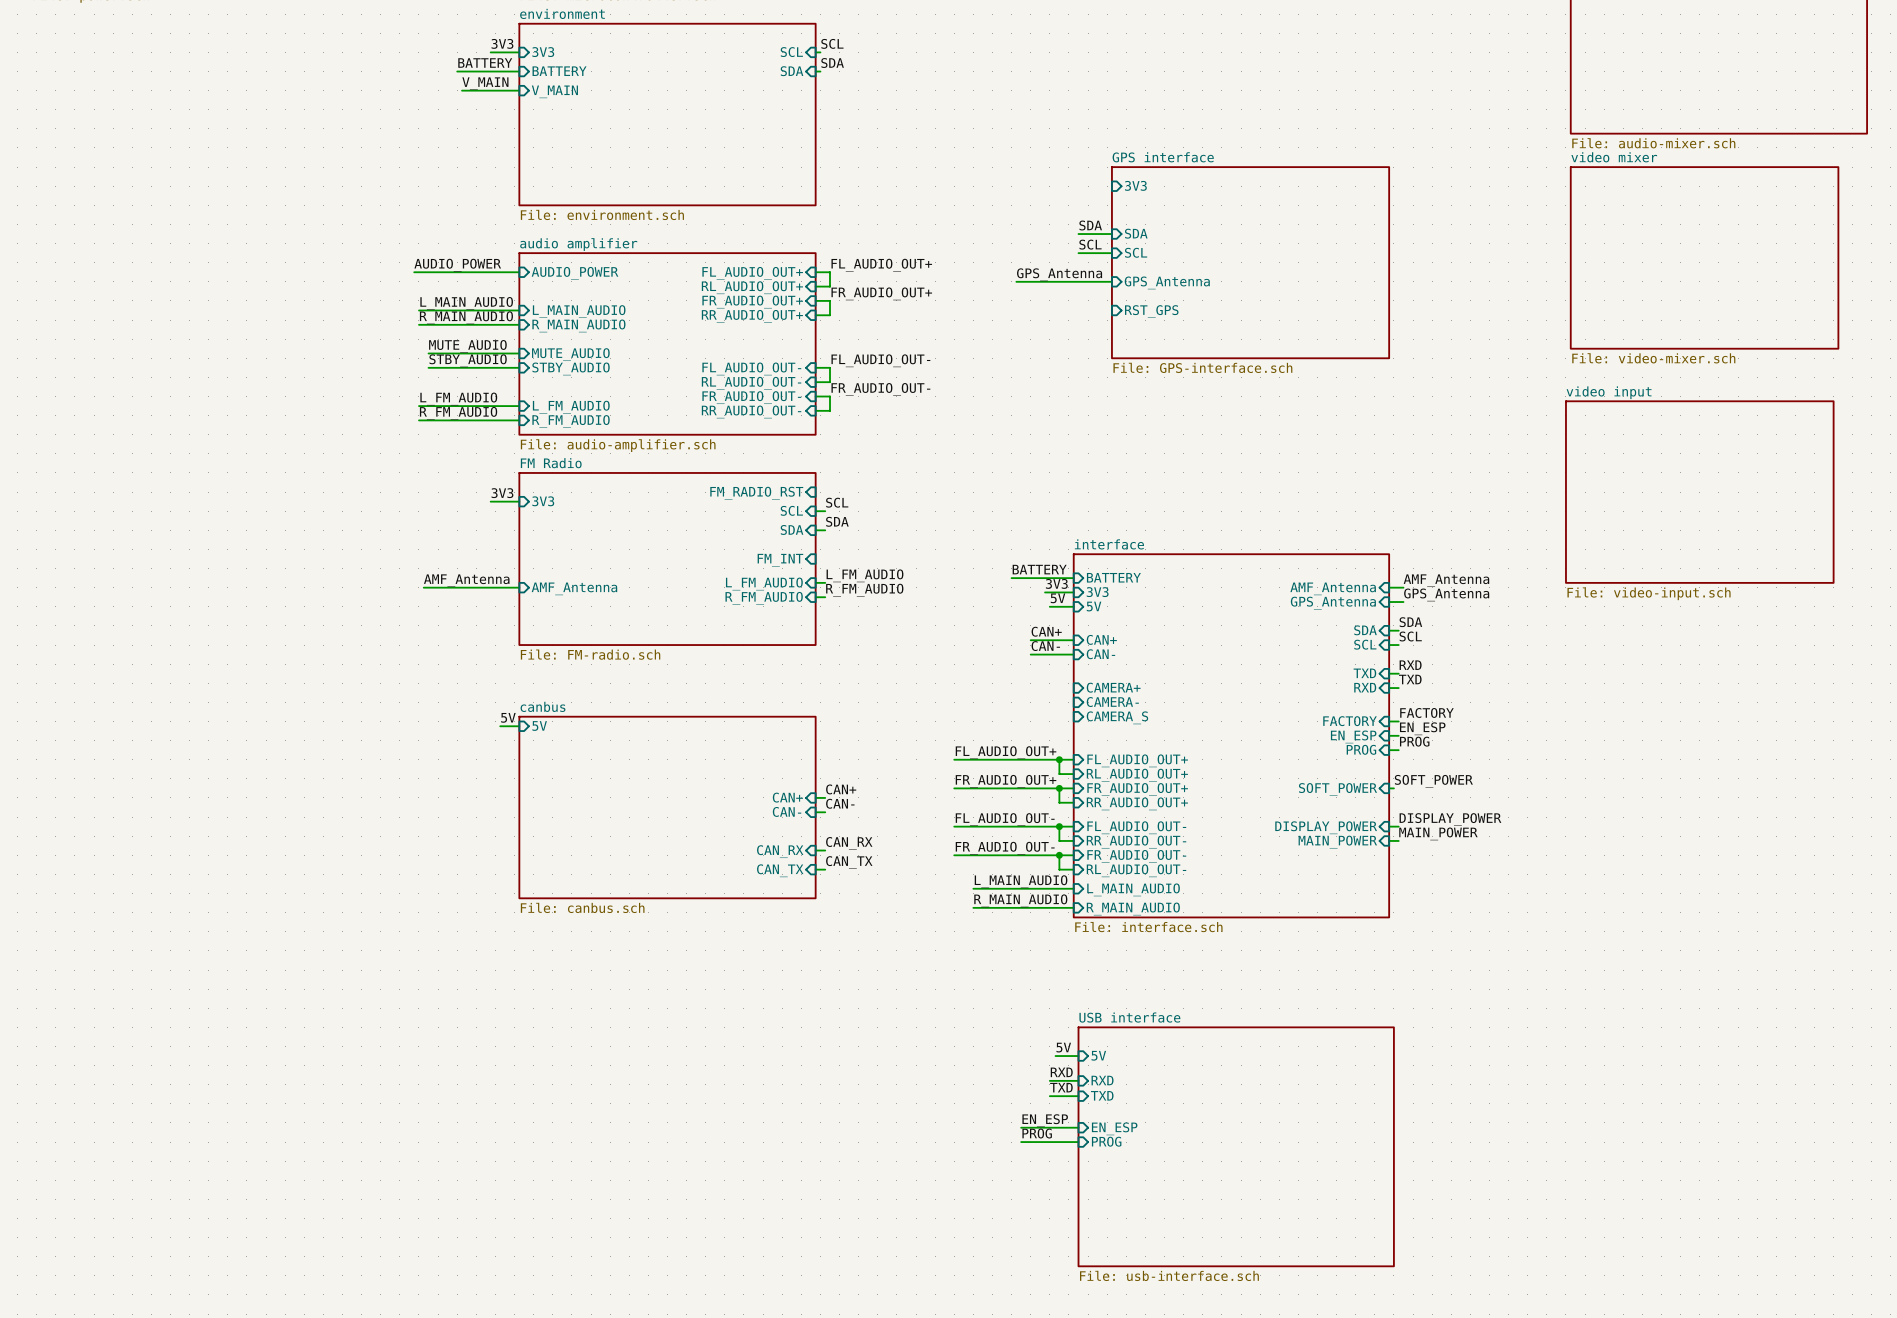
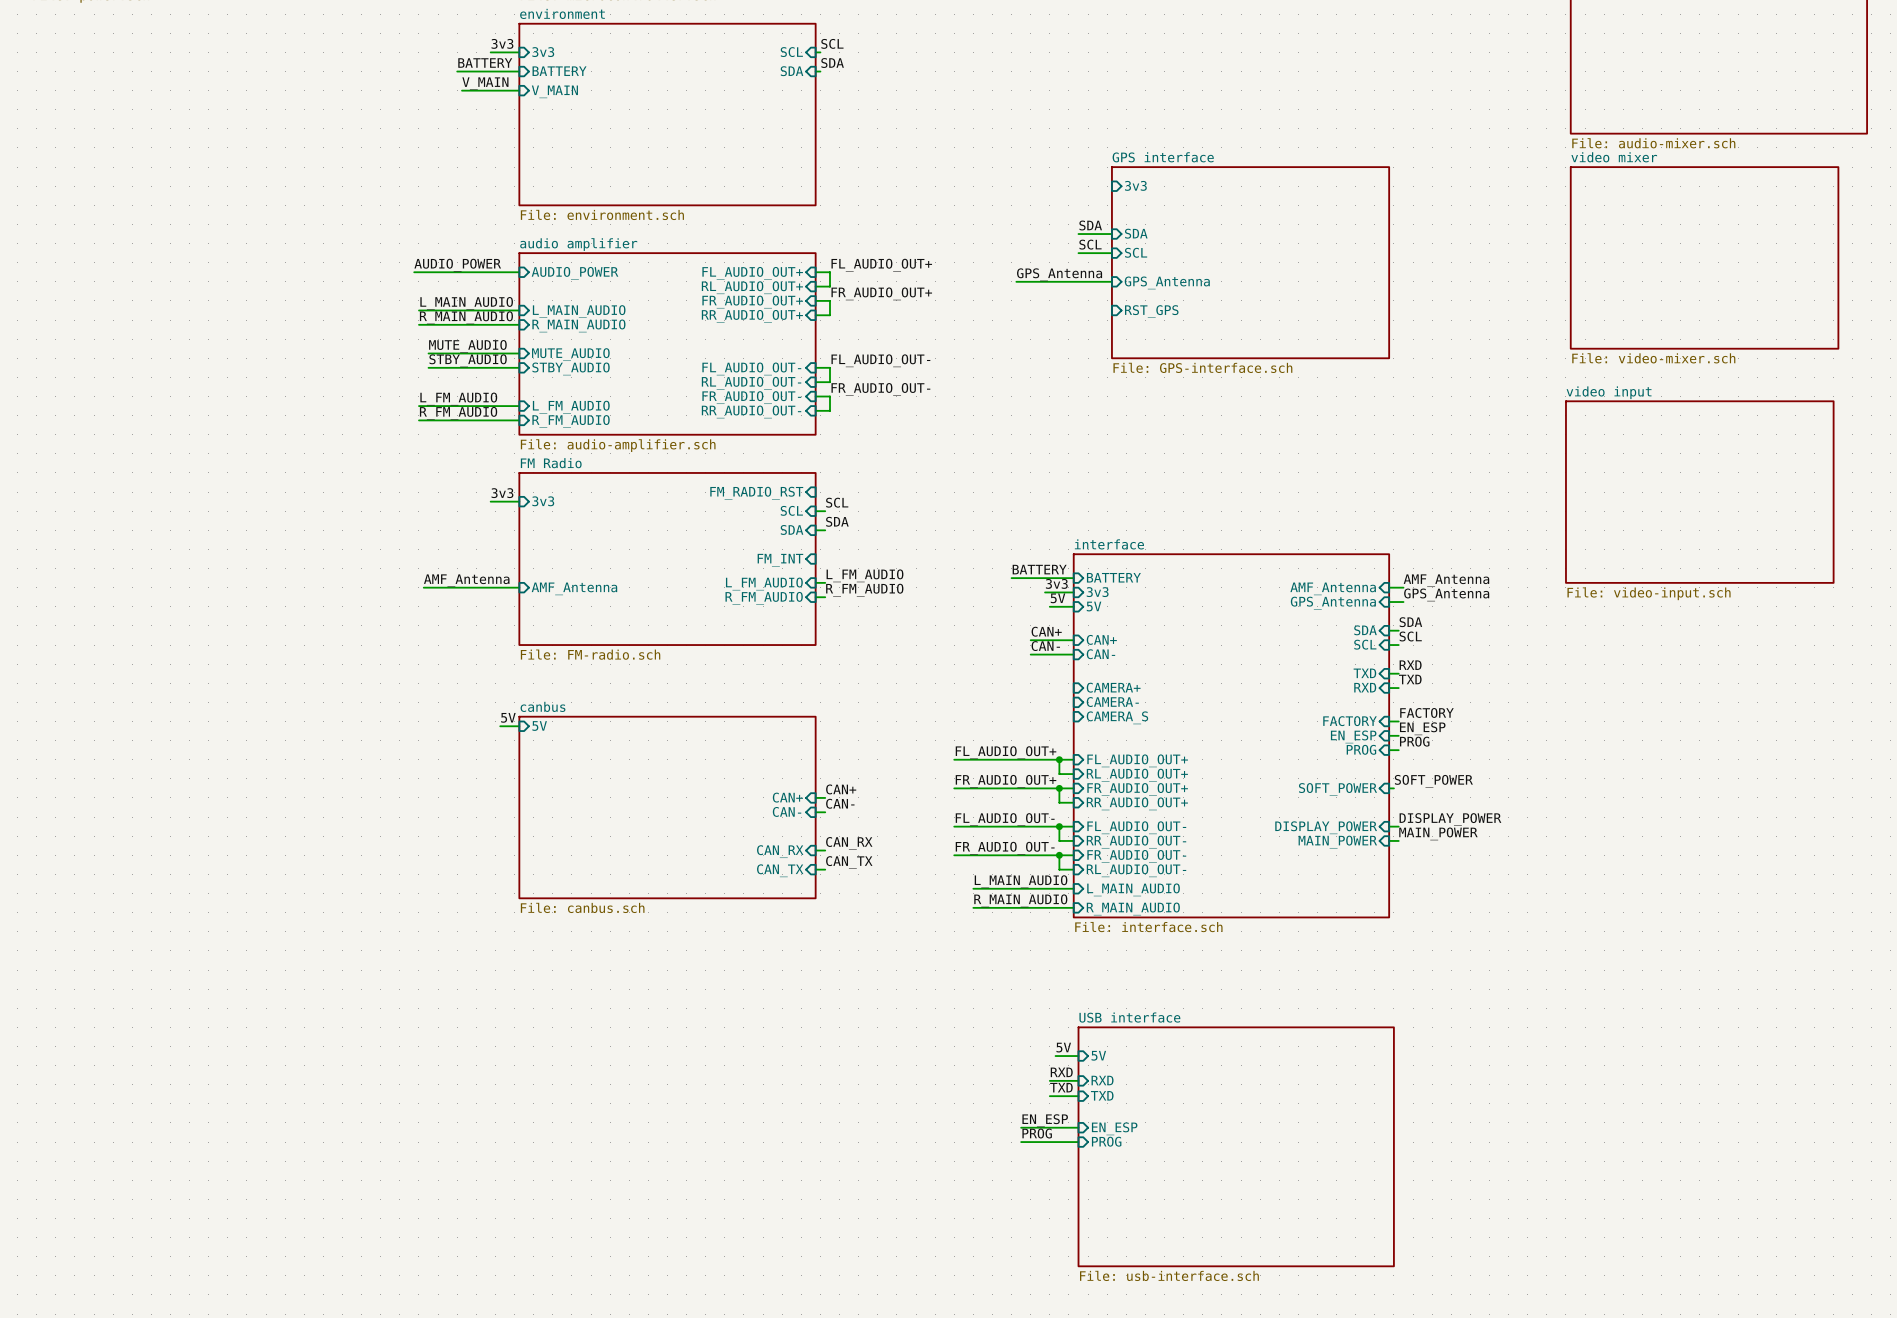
label: 3V3 (502, 43) -> 3v3 (502, 43)
sheet pin: 3V3 (543, 52) -> 3v3 (543, 52)
sheet pin: 3V3 (1135, 185) -> 3v3 (1135, 185)
label: 3V3 (502, 493) -> 3v3 (502, 493)
sheet pin: 3V3 (543, 501) -> 3v3 (543, 501)
label: 3V3 (1056, 583) -> 3v3 (1056, 583)
sheet pin: 3V3 (1097, 592) -> 3v3 (1097, 592)

